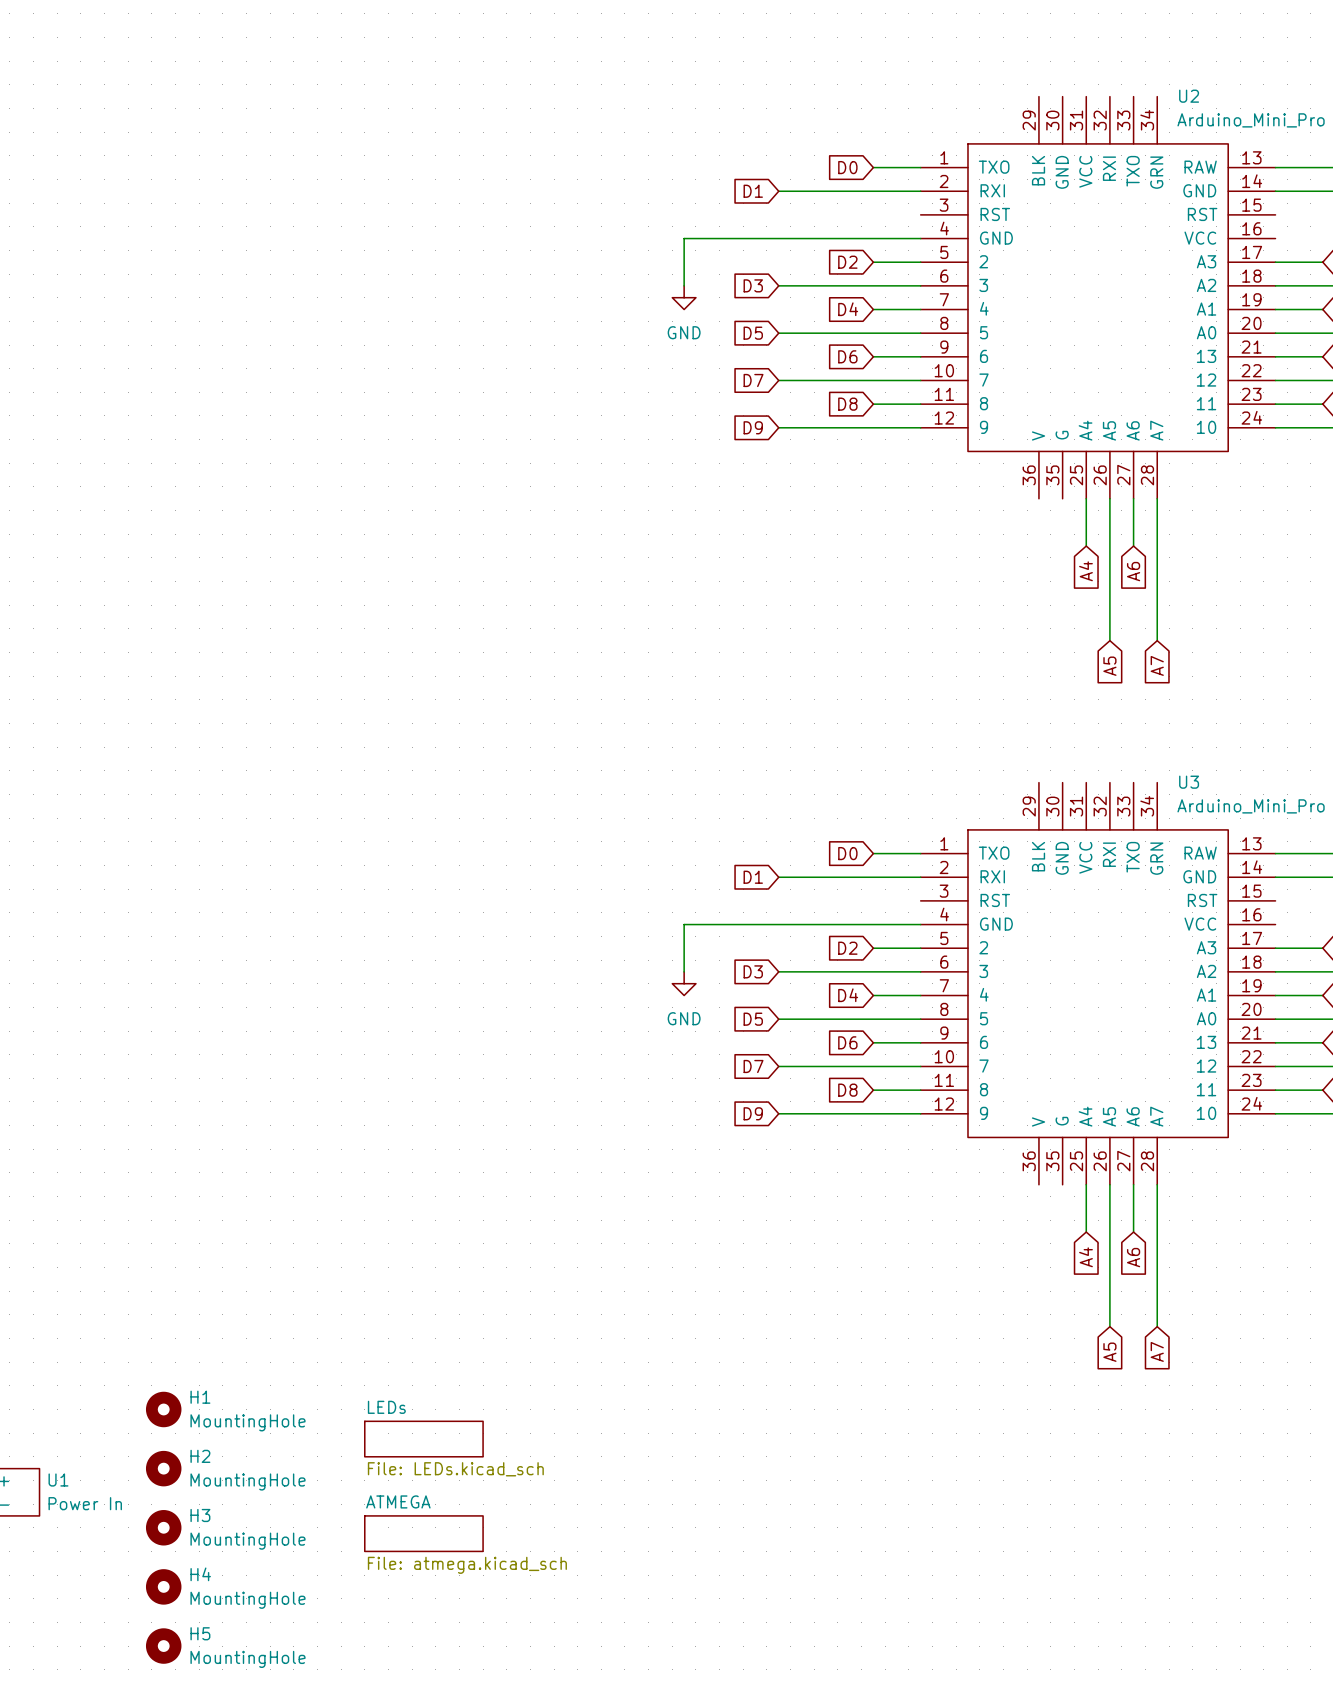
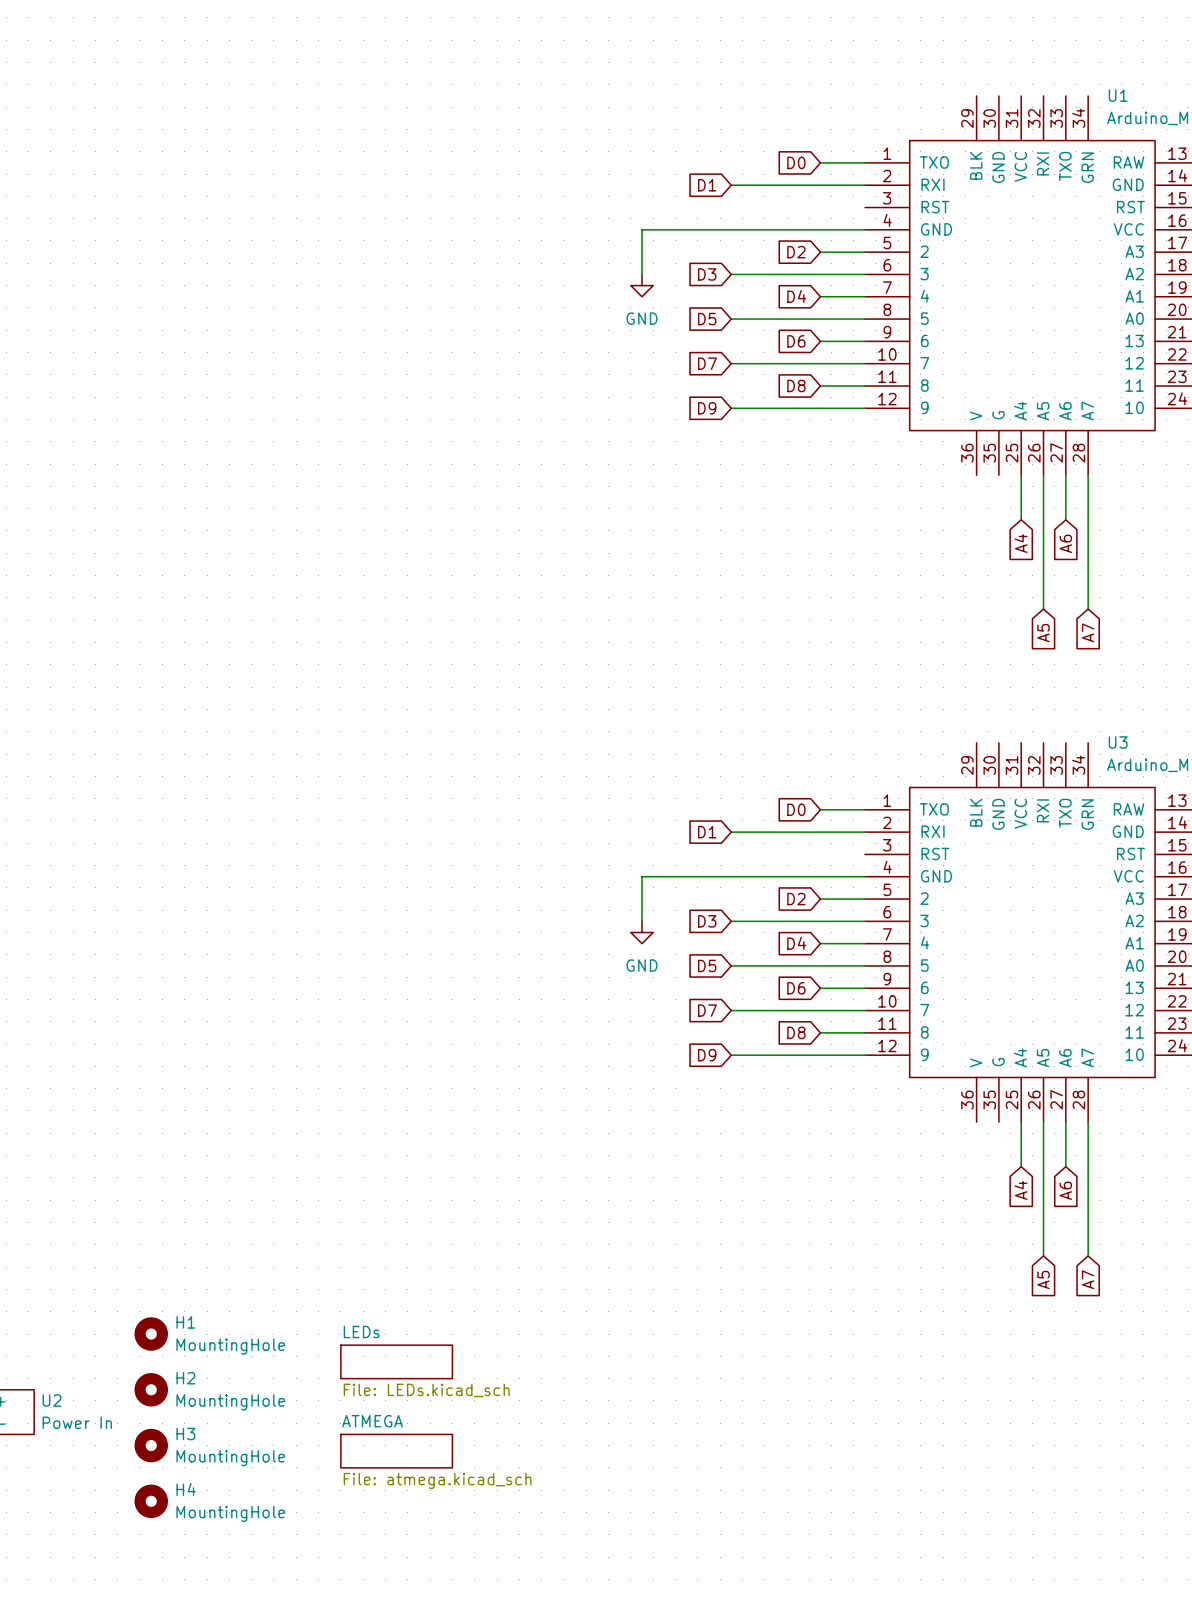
U2 name: U2 (1189, 96) -> U1 (1118, 95)
U1 name: U1 (58, 1480) -> U2 (52, 1400)
H5: MountingHole (163, 1646) -> none

